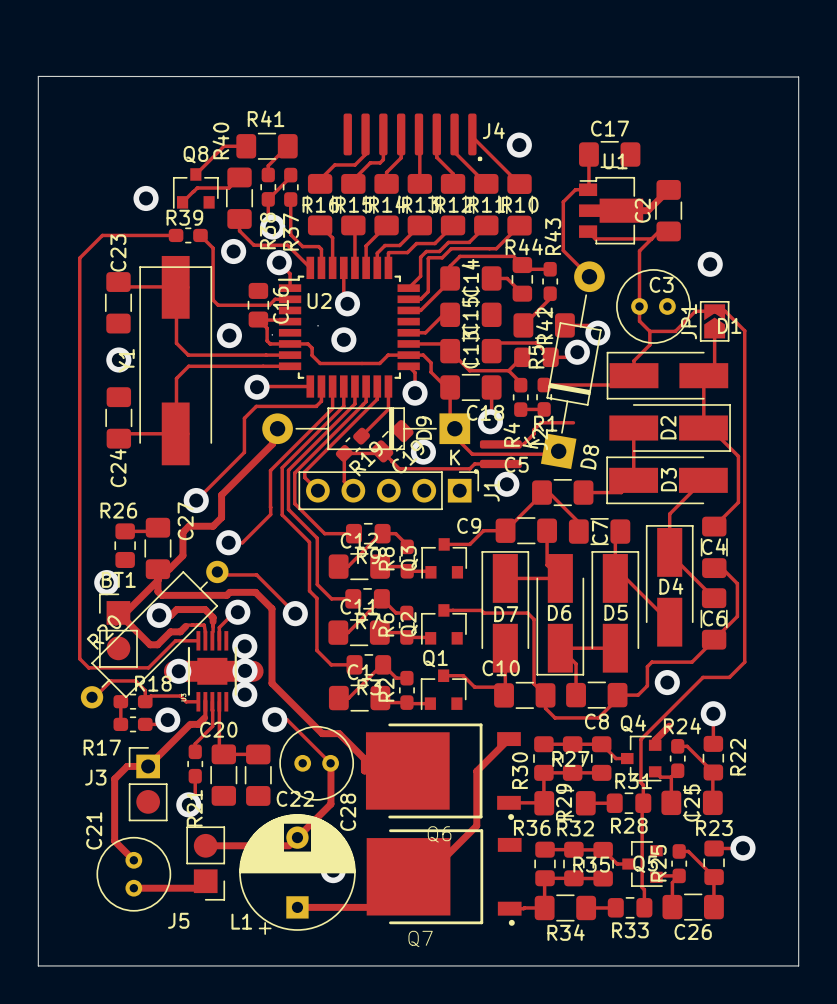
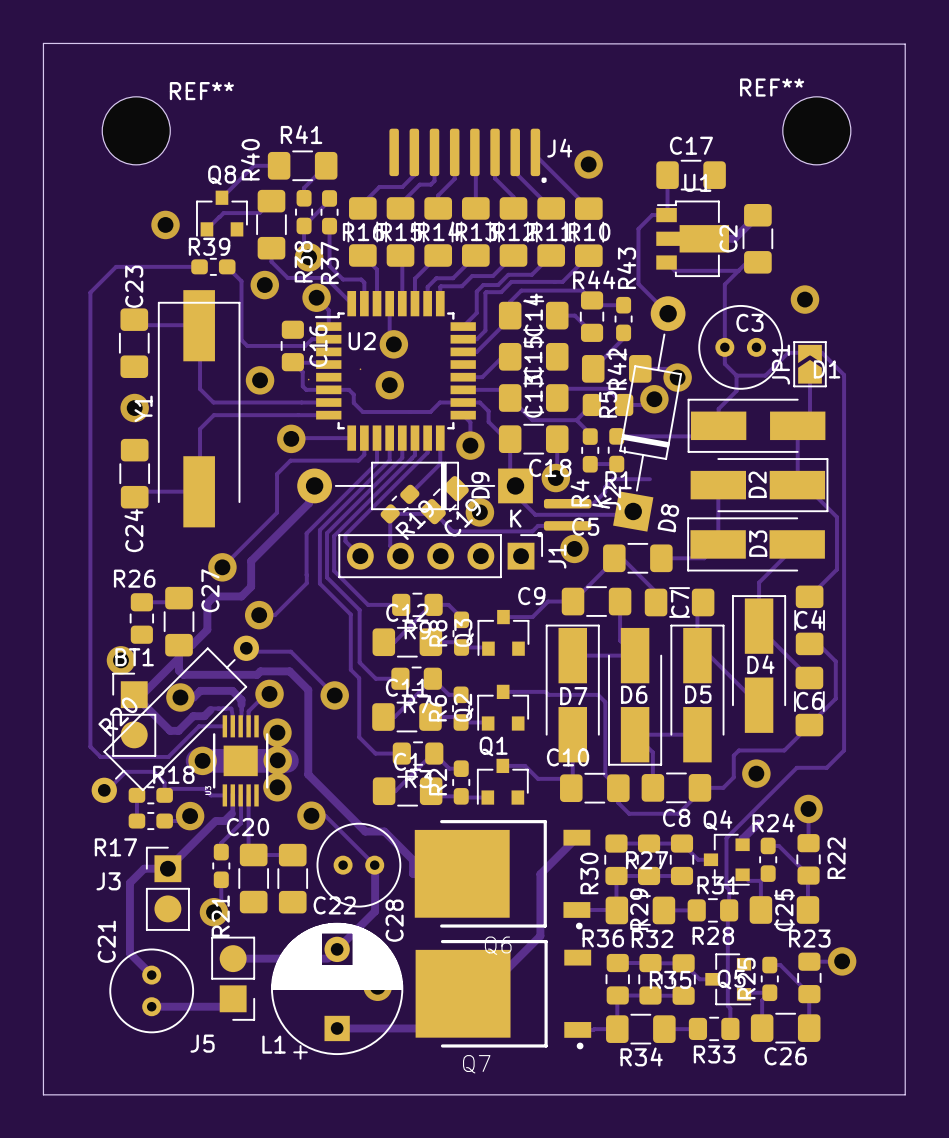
board edge: (38, 76) (798, 77) -> (43, 86) (43, 43) (905, 44) (905, 87)
REF**: none -> (136, 130)
REF**: none -> (816, 130)

